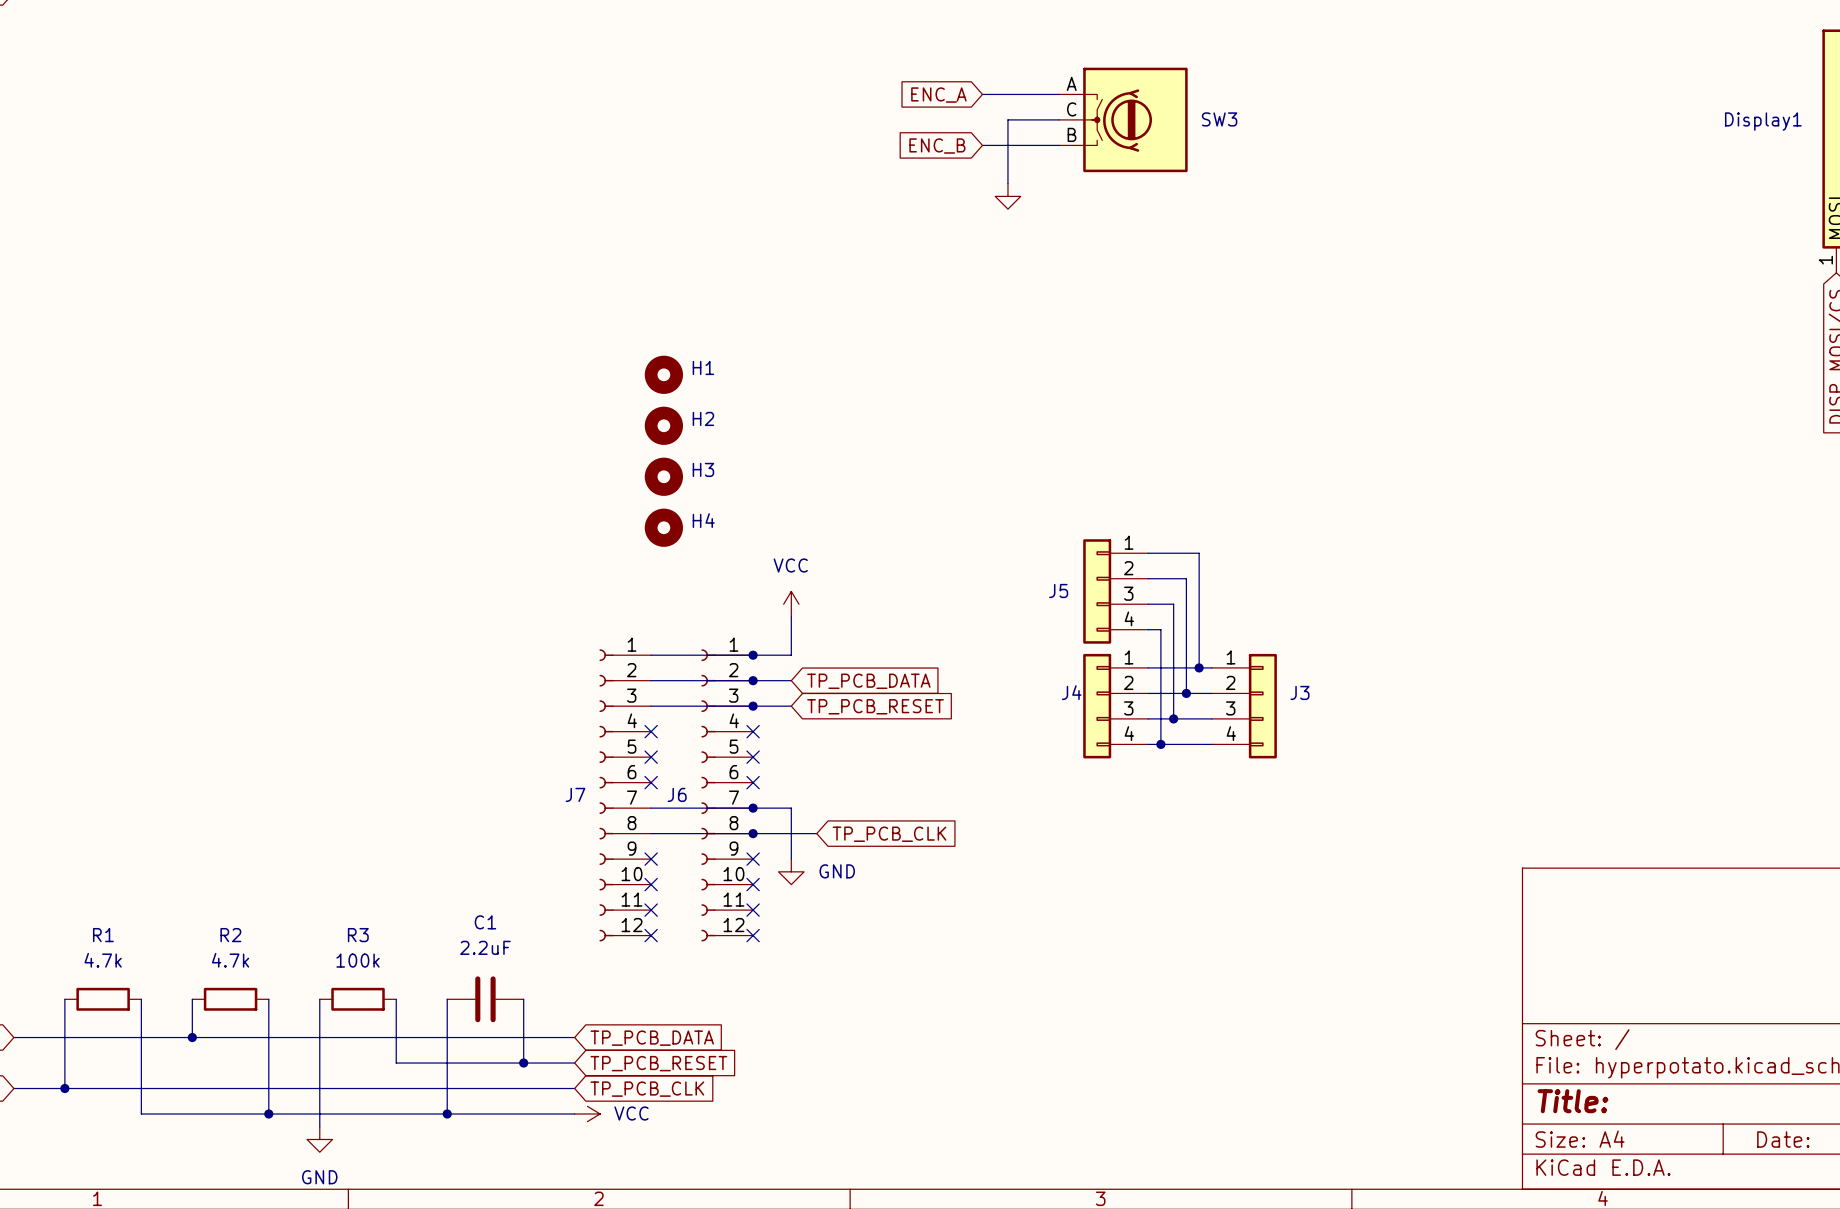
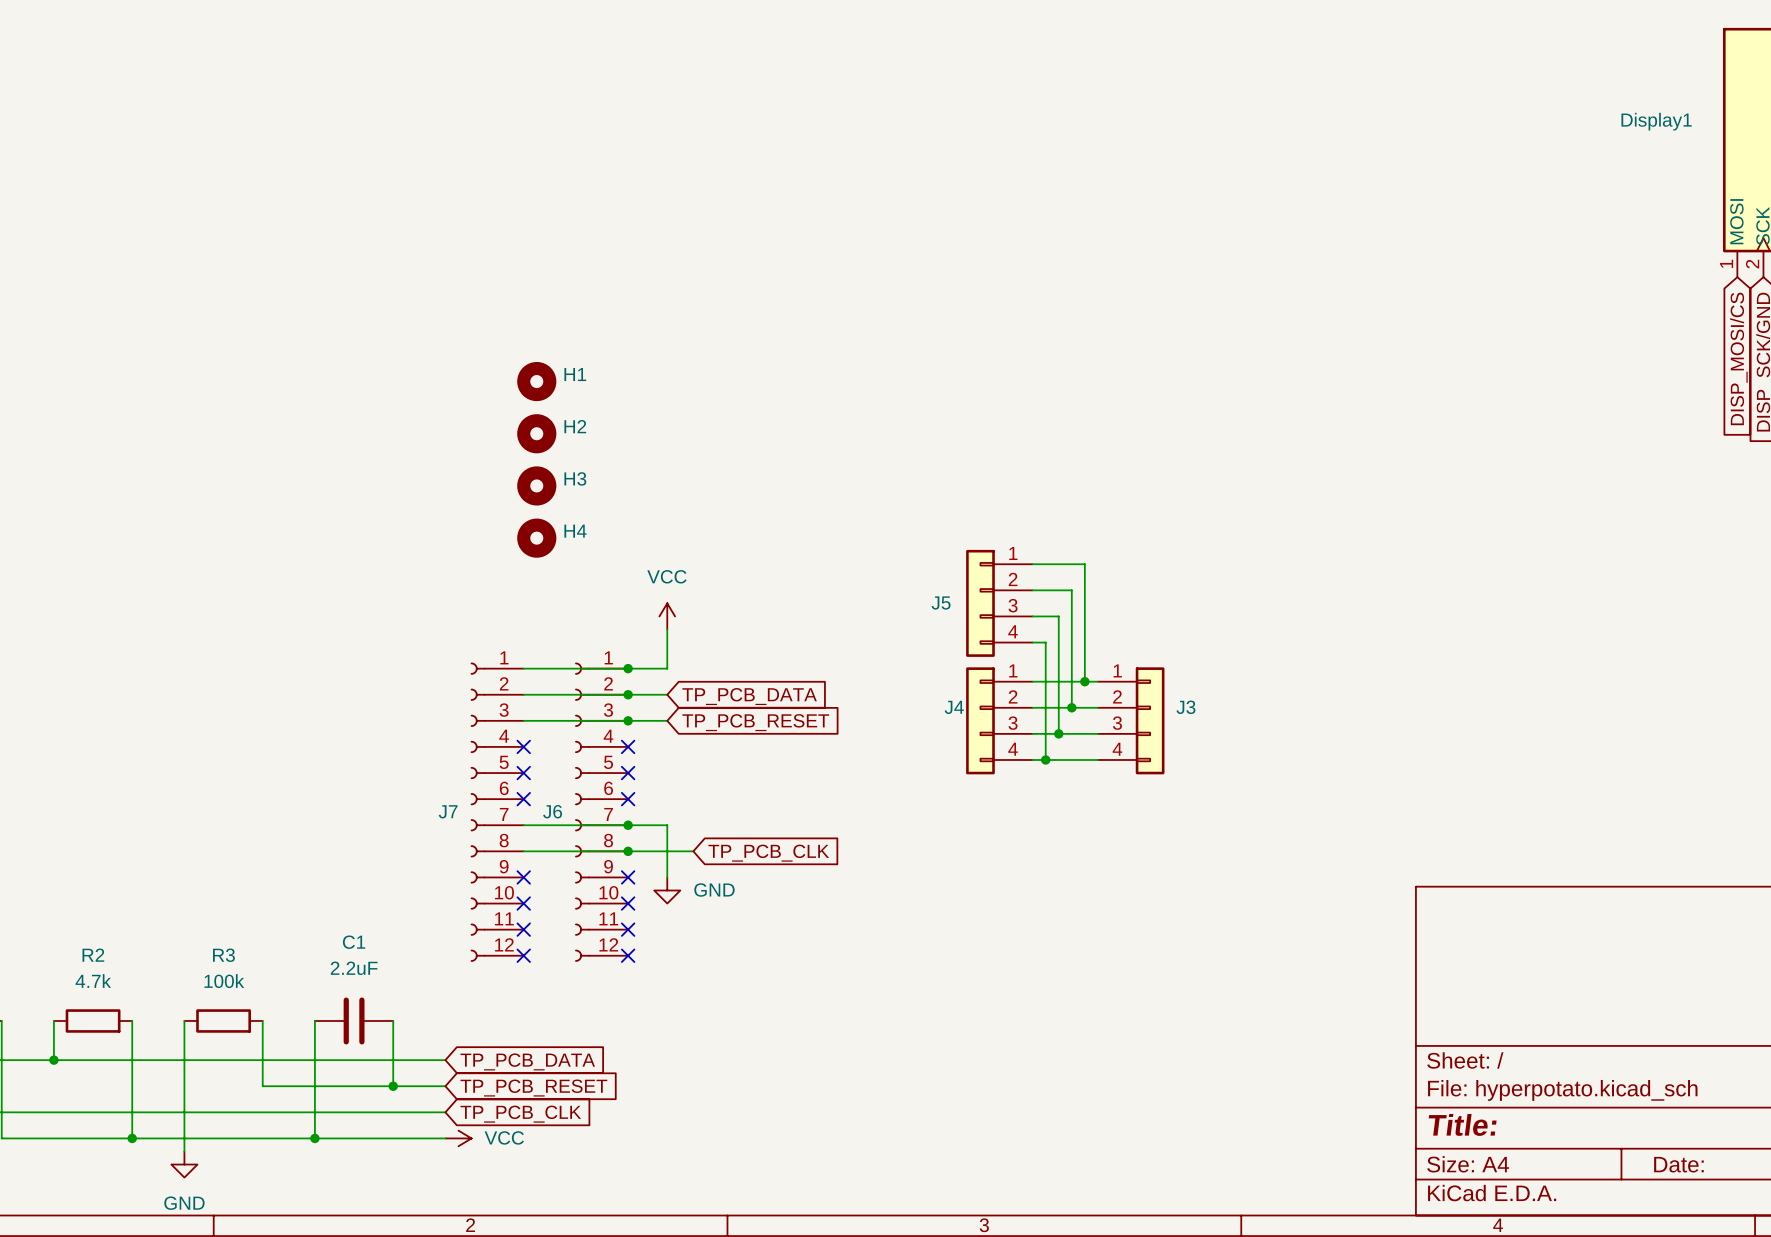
wire: (982, 94) (1058, 94) -> none
global label: ENC_A (938, 95) -> none
wire: (1058, 119) (1007, 119) (1007, 183) -> none
SW3: (1123, 119) -> none
wire: (982, 145) (1058, 145) -> none
global label: ENC_B (937, 146) -> none
power symbol: (1007, 196) -> none

